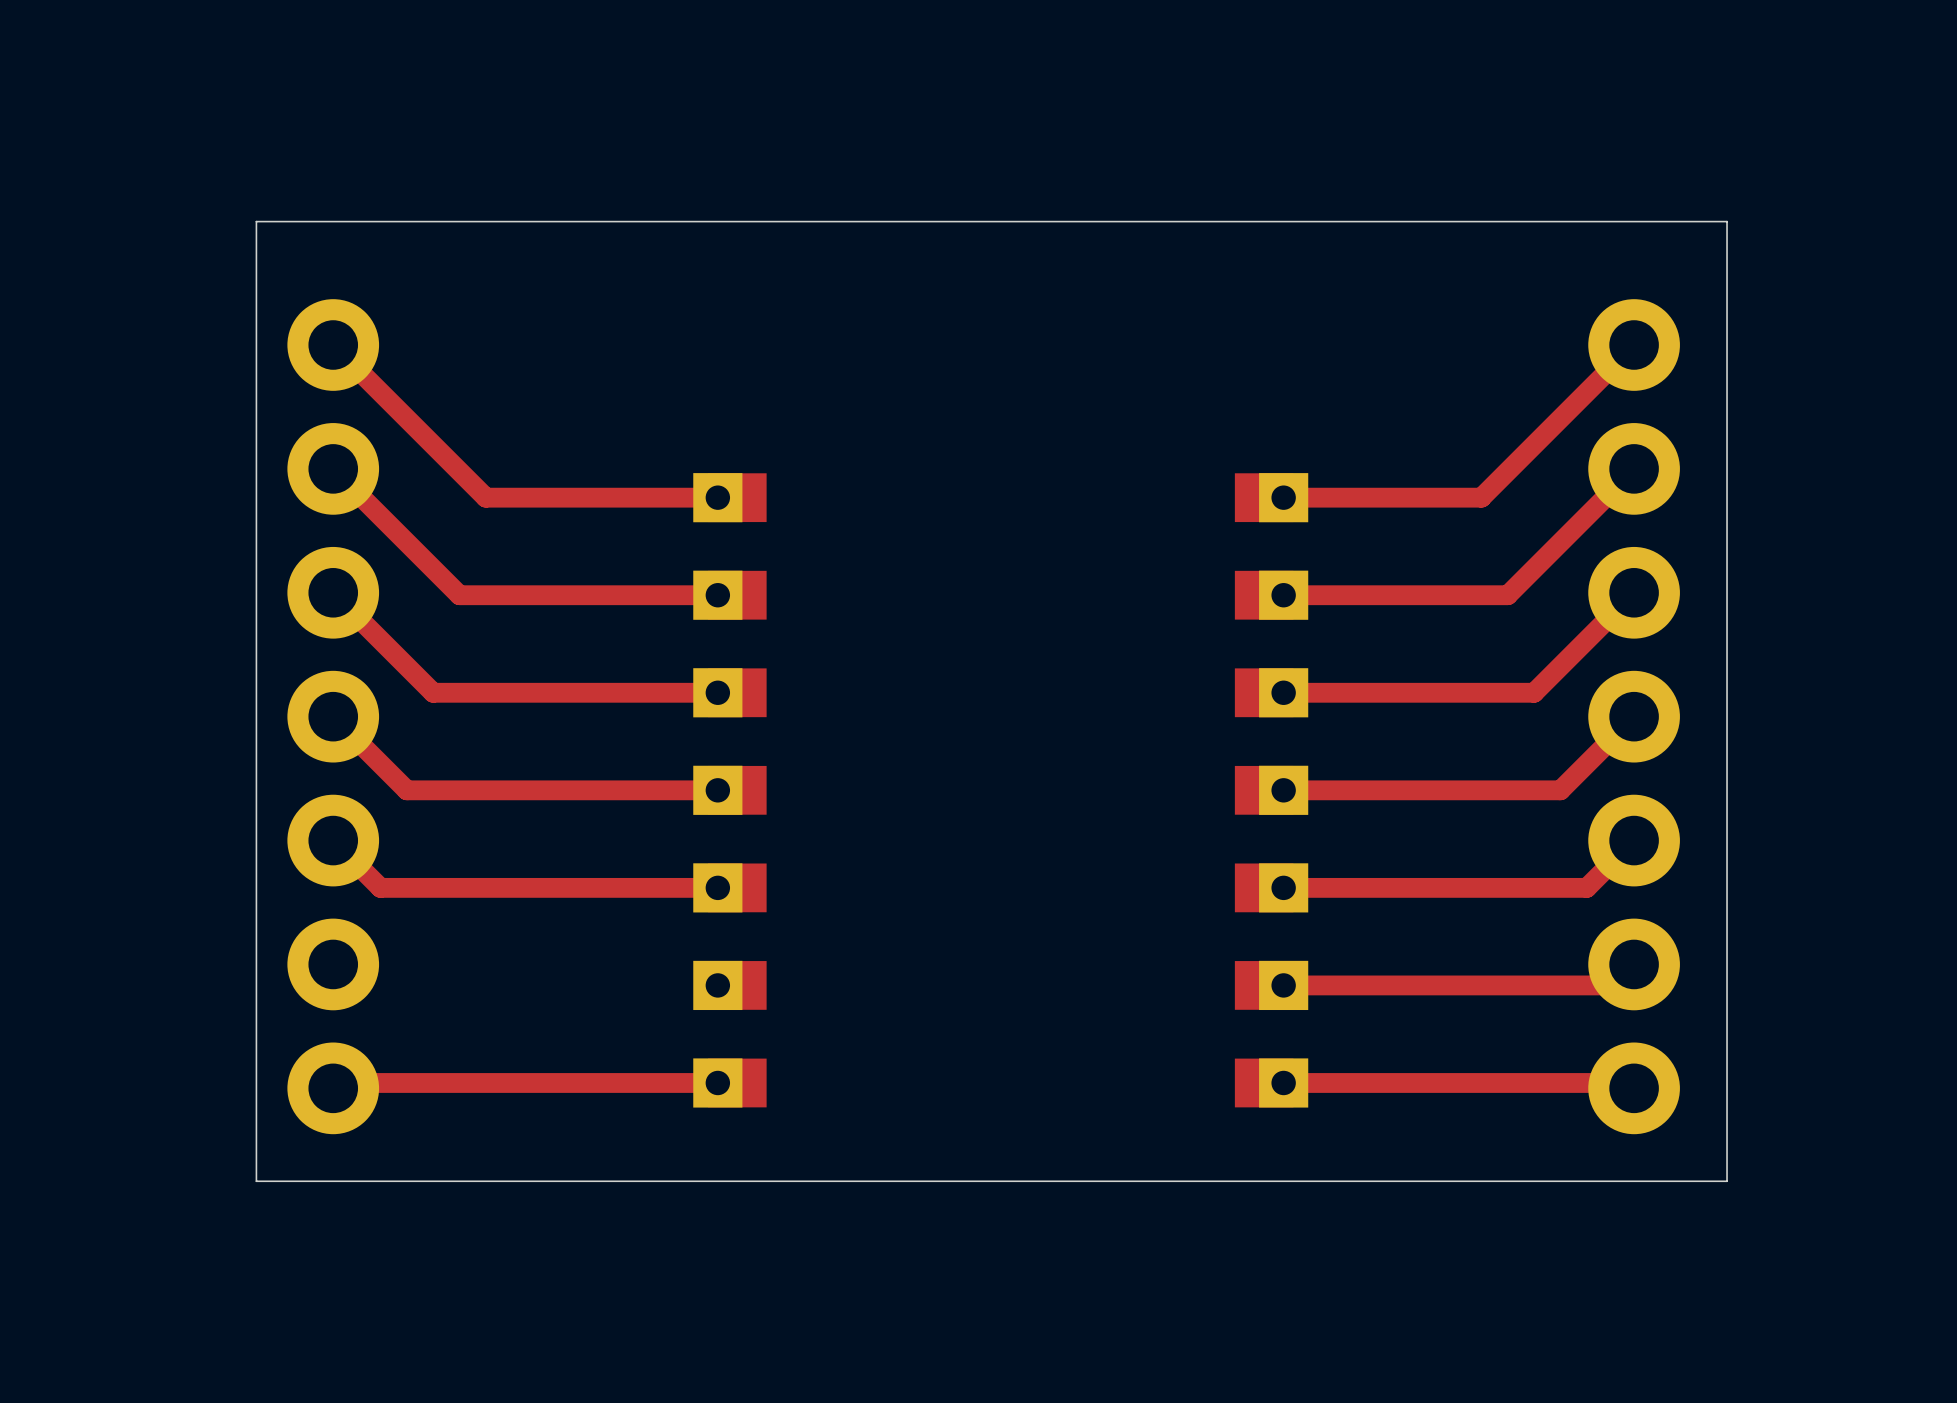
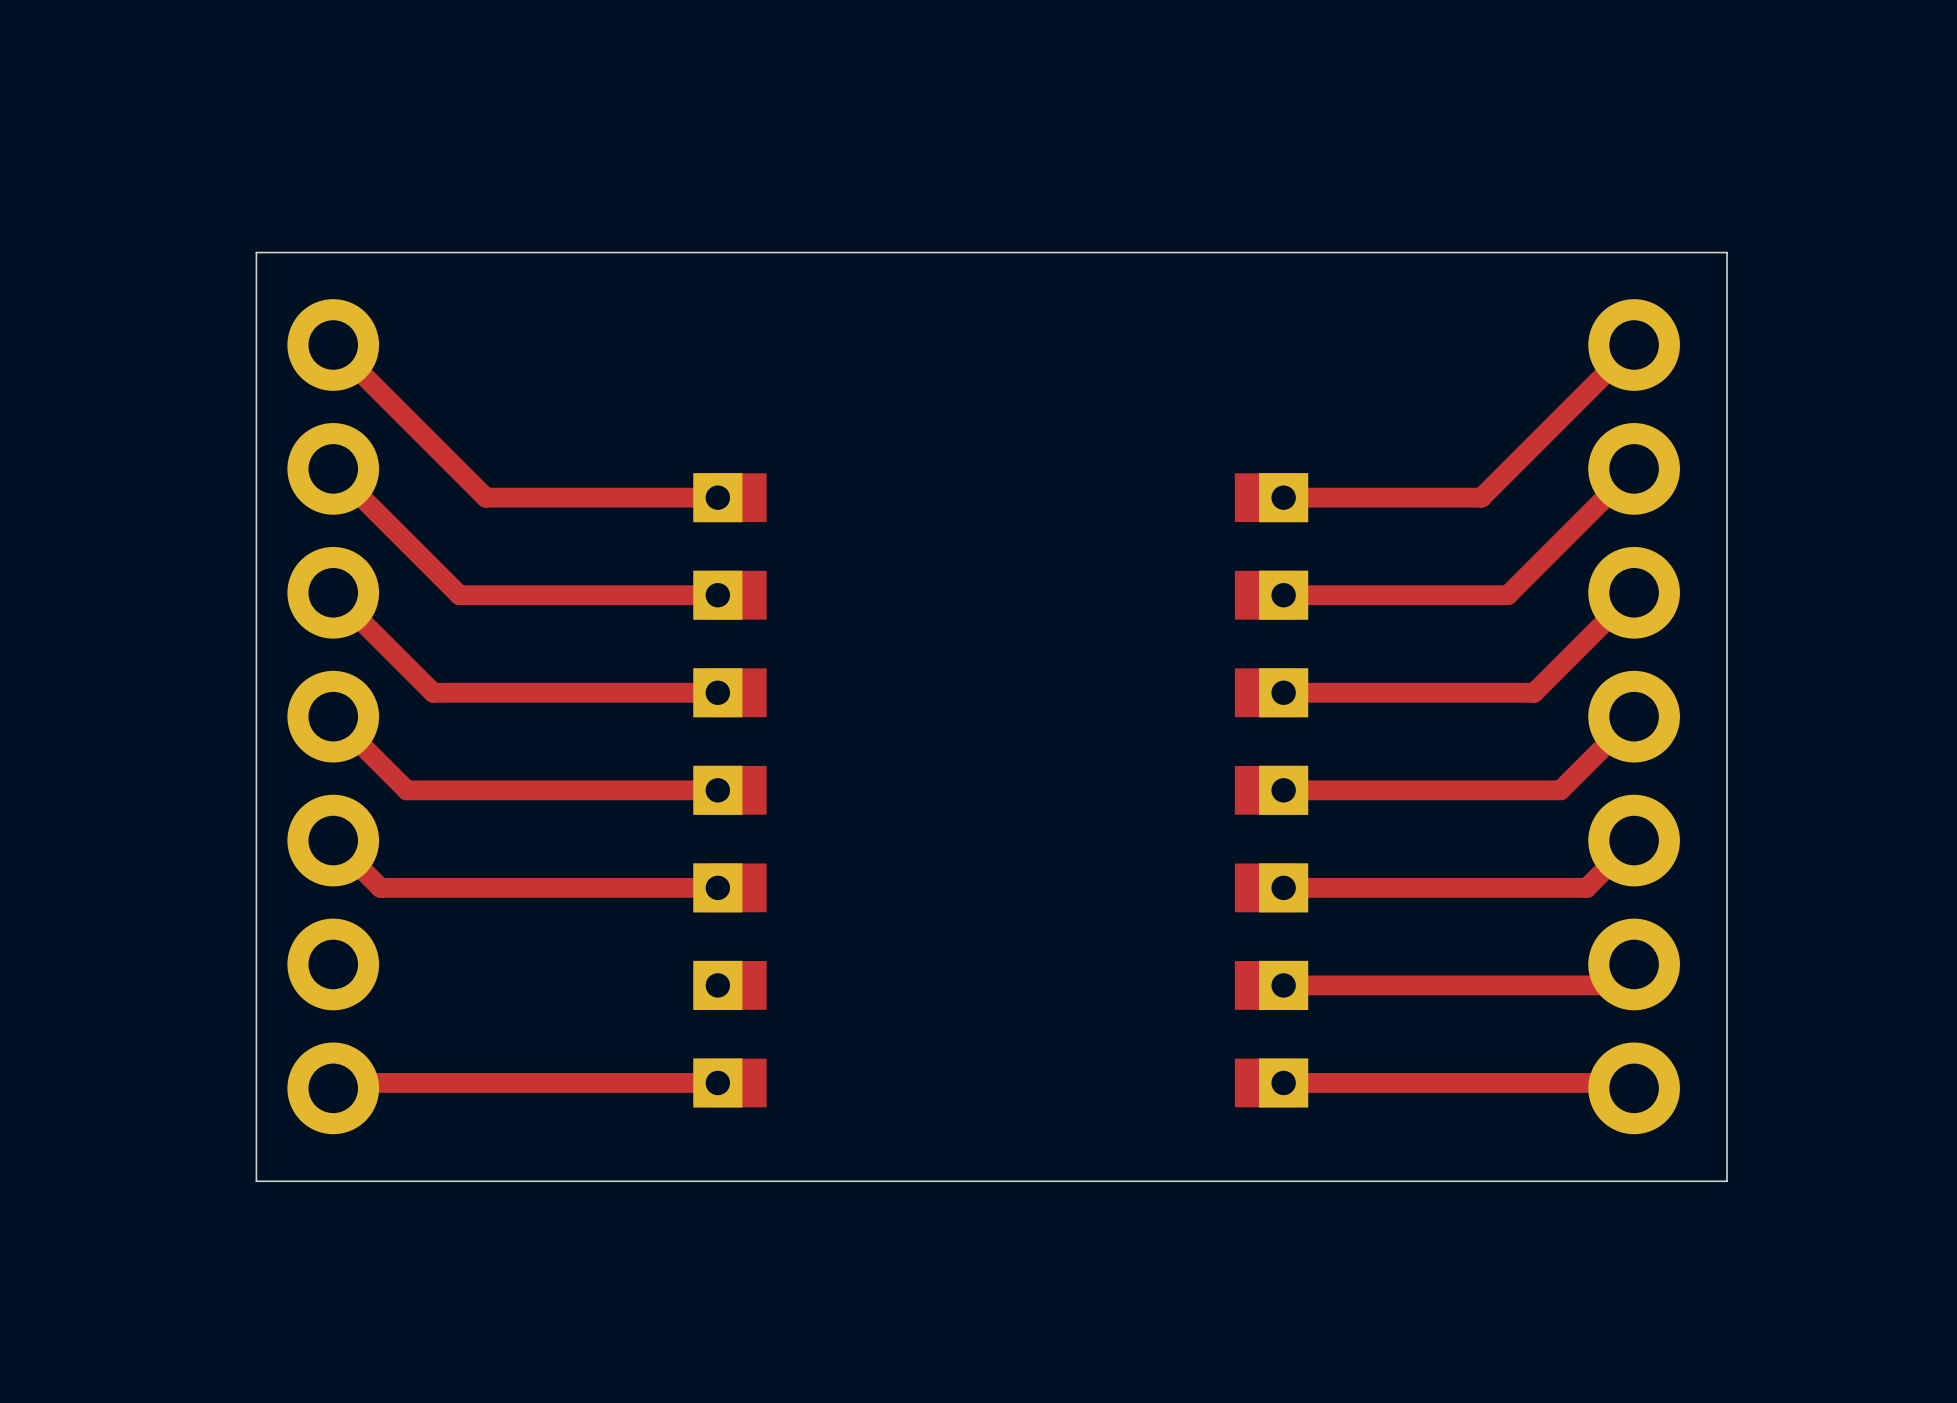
board edge: (1727, 252) (1727, 221) (256, 221) (256, 252) -> (1727, 252) (256, 252)

